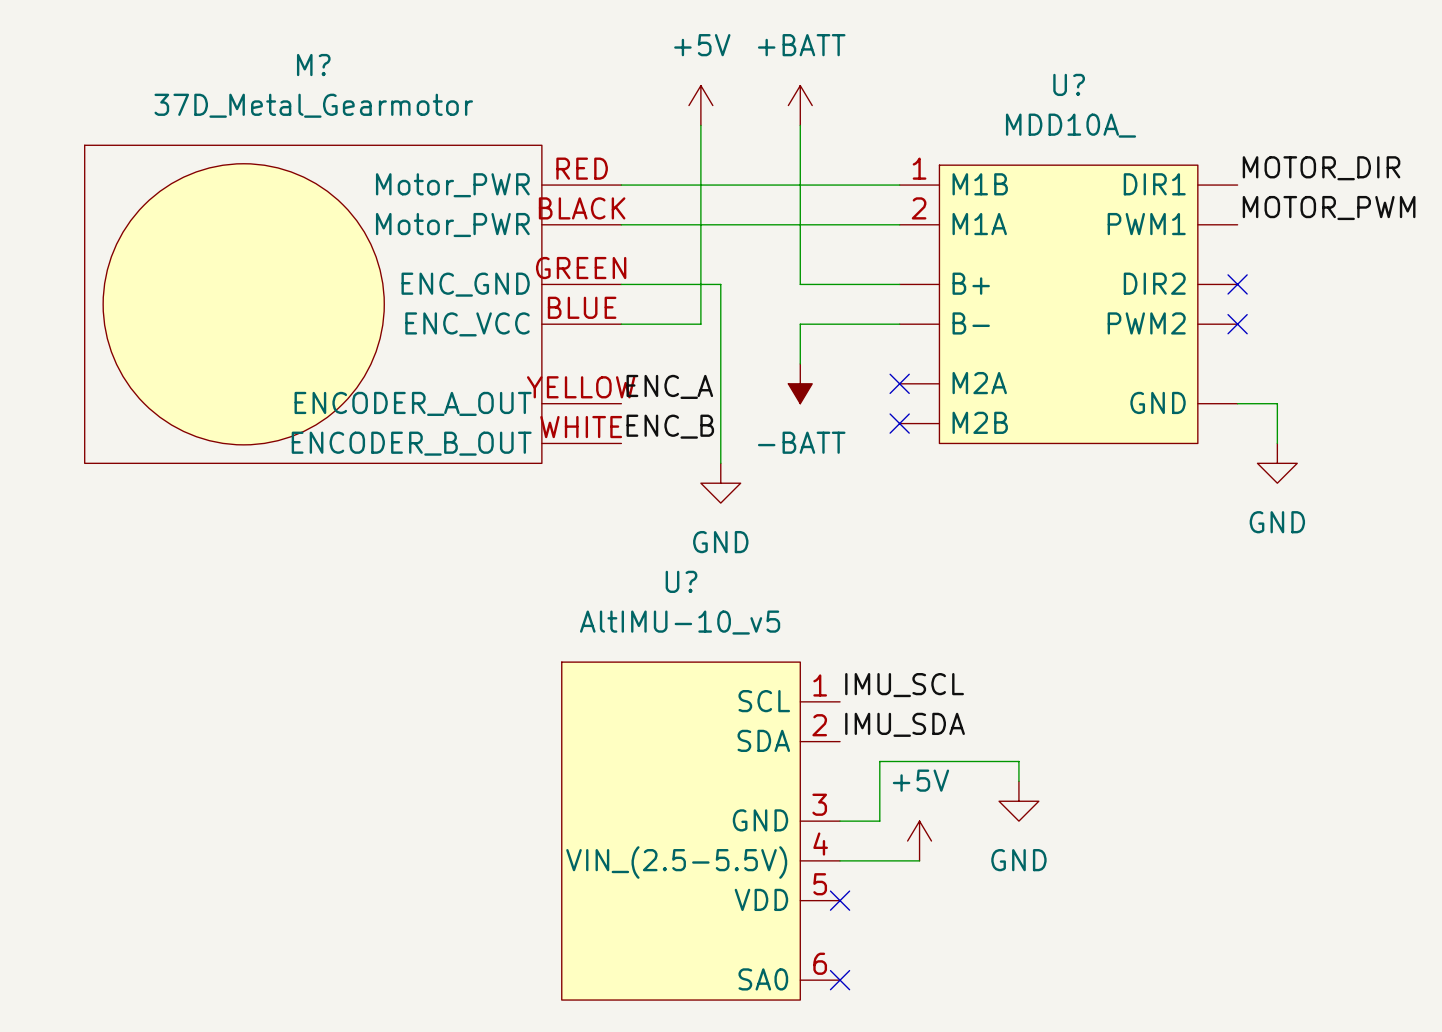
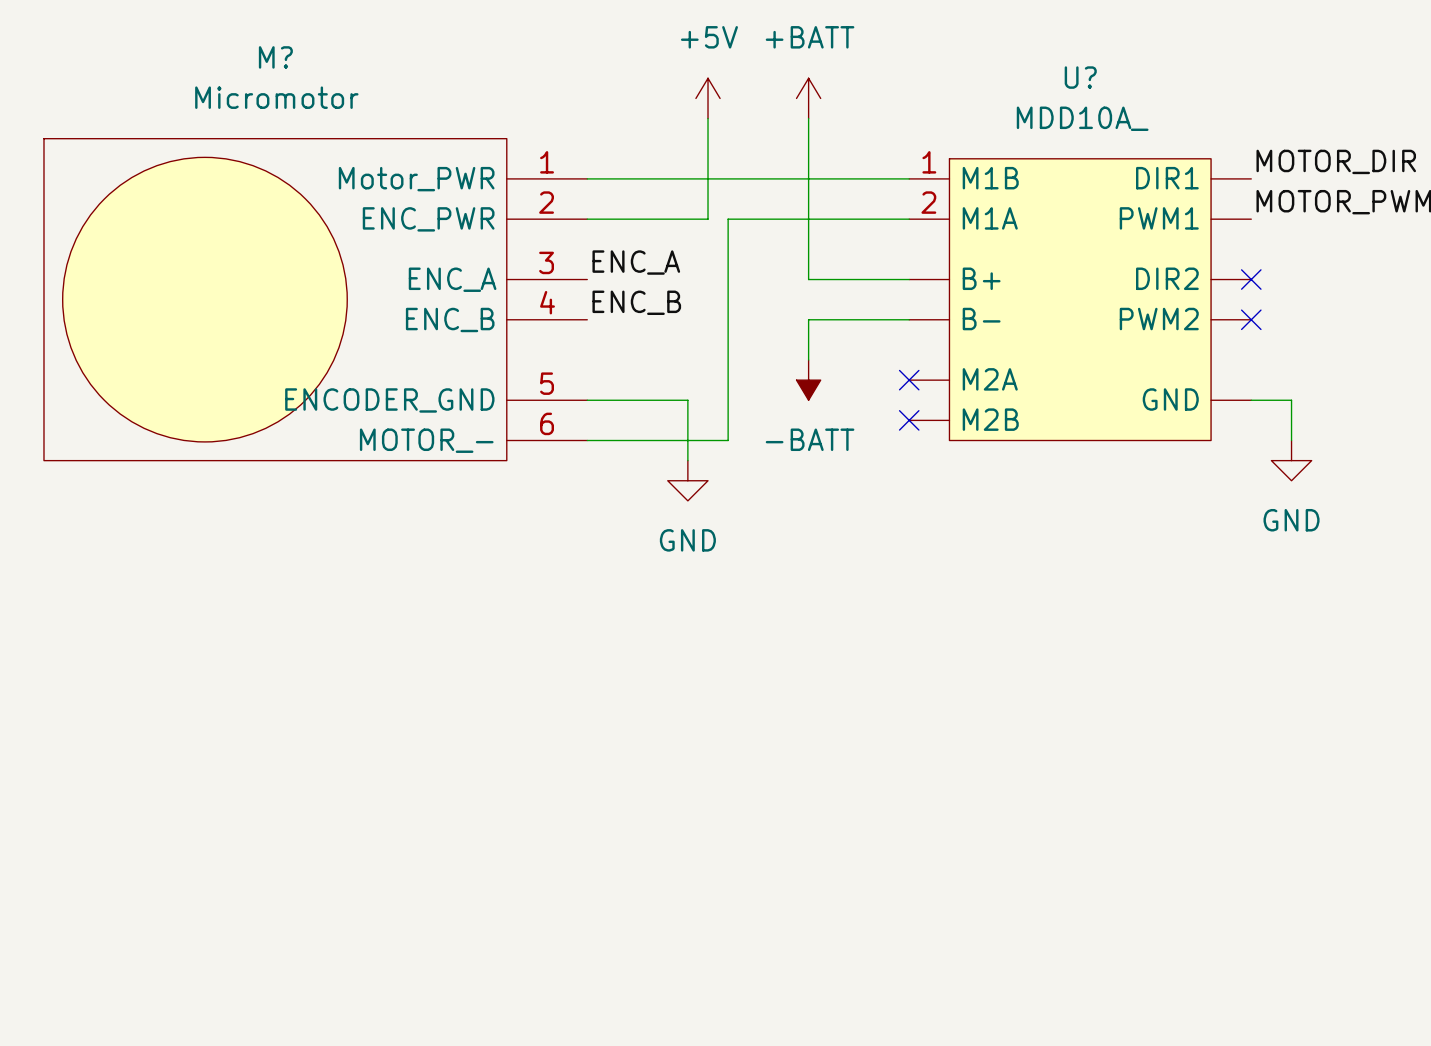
wire: (720, 224) (700, 224) (700, 324) (621, 324) -> (728, 219) (728, 279)
wire: (621, 284) (720, 284) -> none
M?: none -> Micromotor (315, 299)
M?: 37D_Metal_Gearmotor (353, 304) -> none
label position: ENC_A (669, 386) -> ENC_A (636, 262)
wire: none -> (587, 400) (687, 400) (687, 460)
label position: ENC_B (670, 426) -> ENC_B (636, 302)
wire: (720, 443) (720, 463) -> (728, 440) (587, 440)
power symbol position: GND (720, 483) -> GND (687, 480)
label: IMU_SCL (904, 685) -> none
label: IMU_SDA (905, 724) -> none
wire: (1018, 781) (1018, 761) (879, 761) (879, 821) (840, 821) -> none
power symbol: GND (1018, 801) -> none
U?: AltIMU-10_v5 (700, 831) -> none
power symbol: +5V (919, 841) -> none
wire: (840, 860) (919, 860) -> none
no-connect mark: (840, 900) -> none
no-connect mark: (840, 980) -> none

